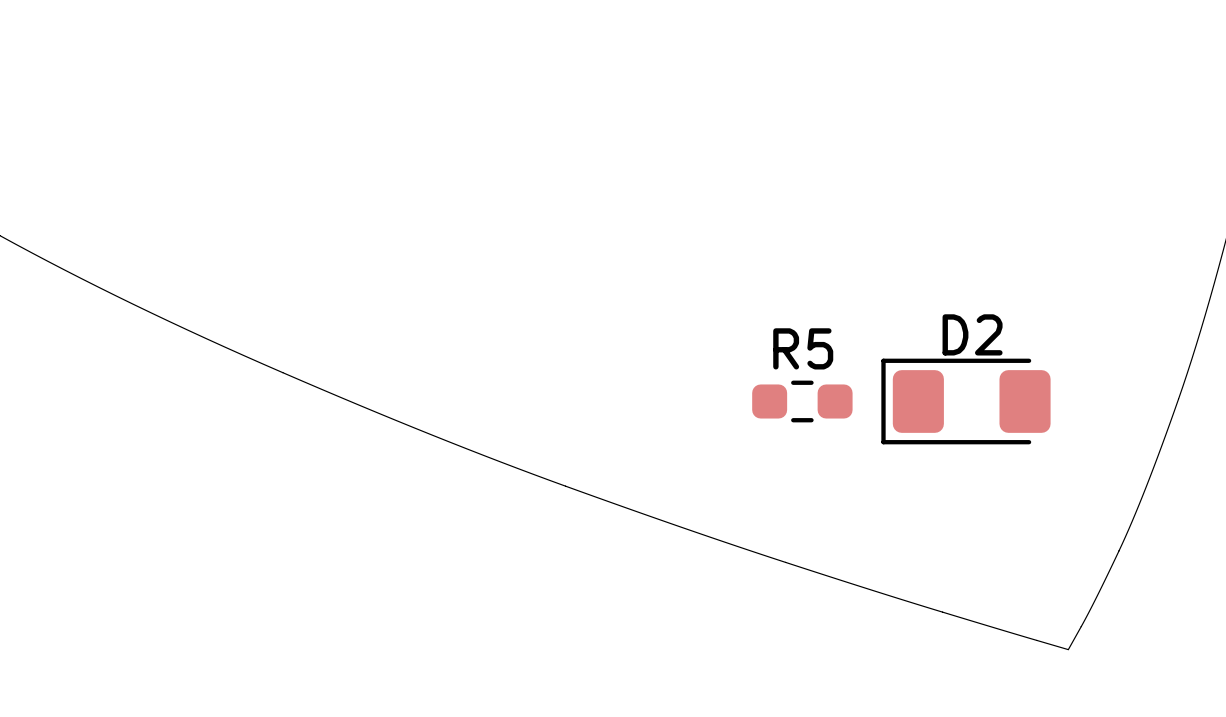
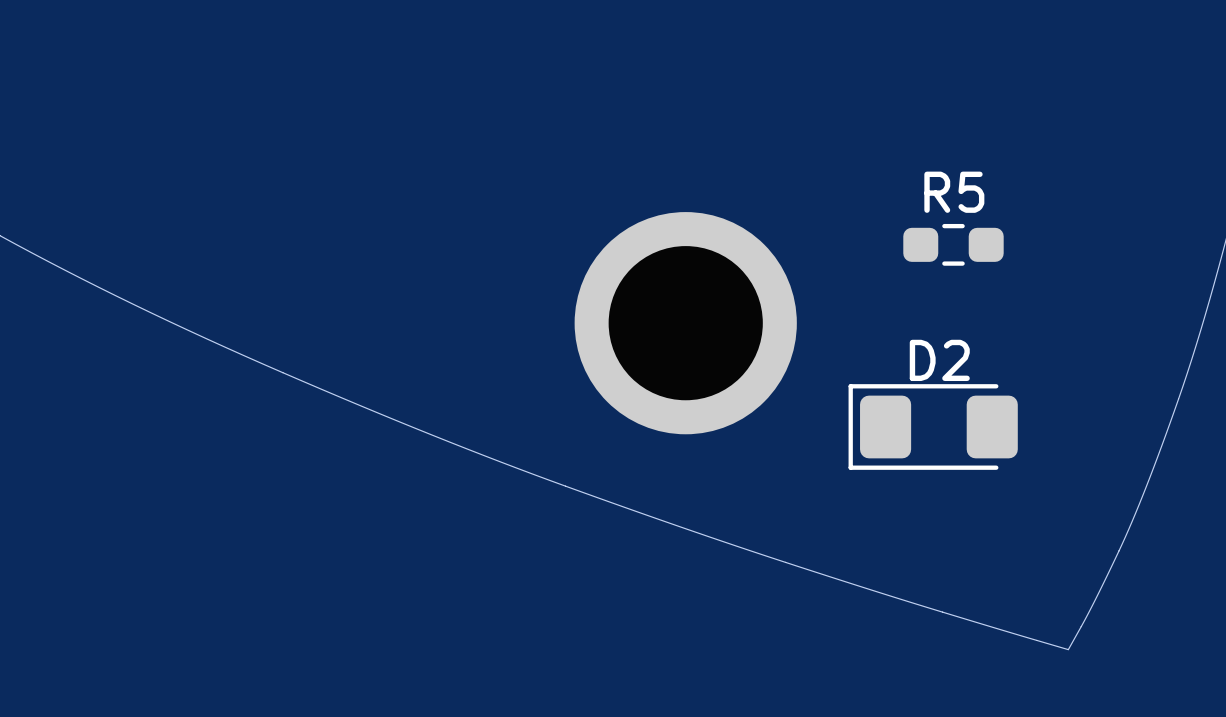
part: none -> (685, 323)
R5 position: (802, 401) -> (953, 244)
D2 position: (965, 401) -> (933, 426)

